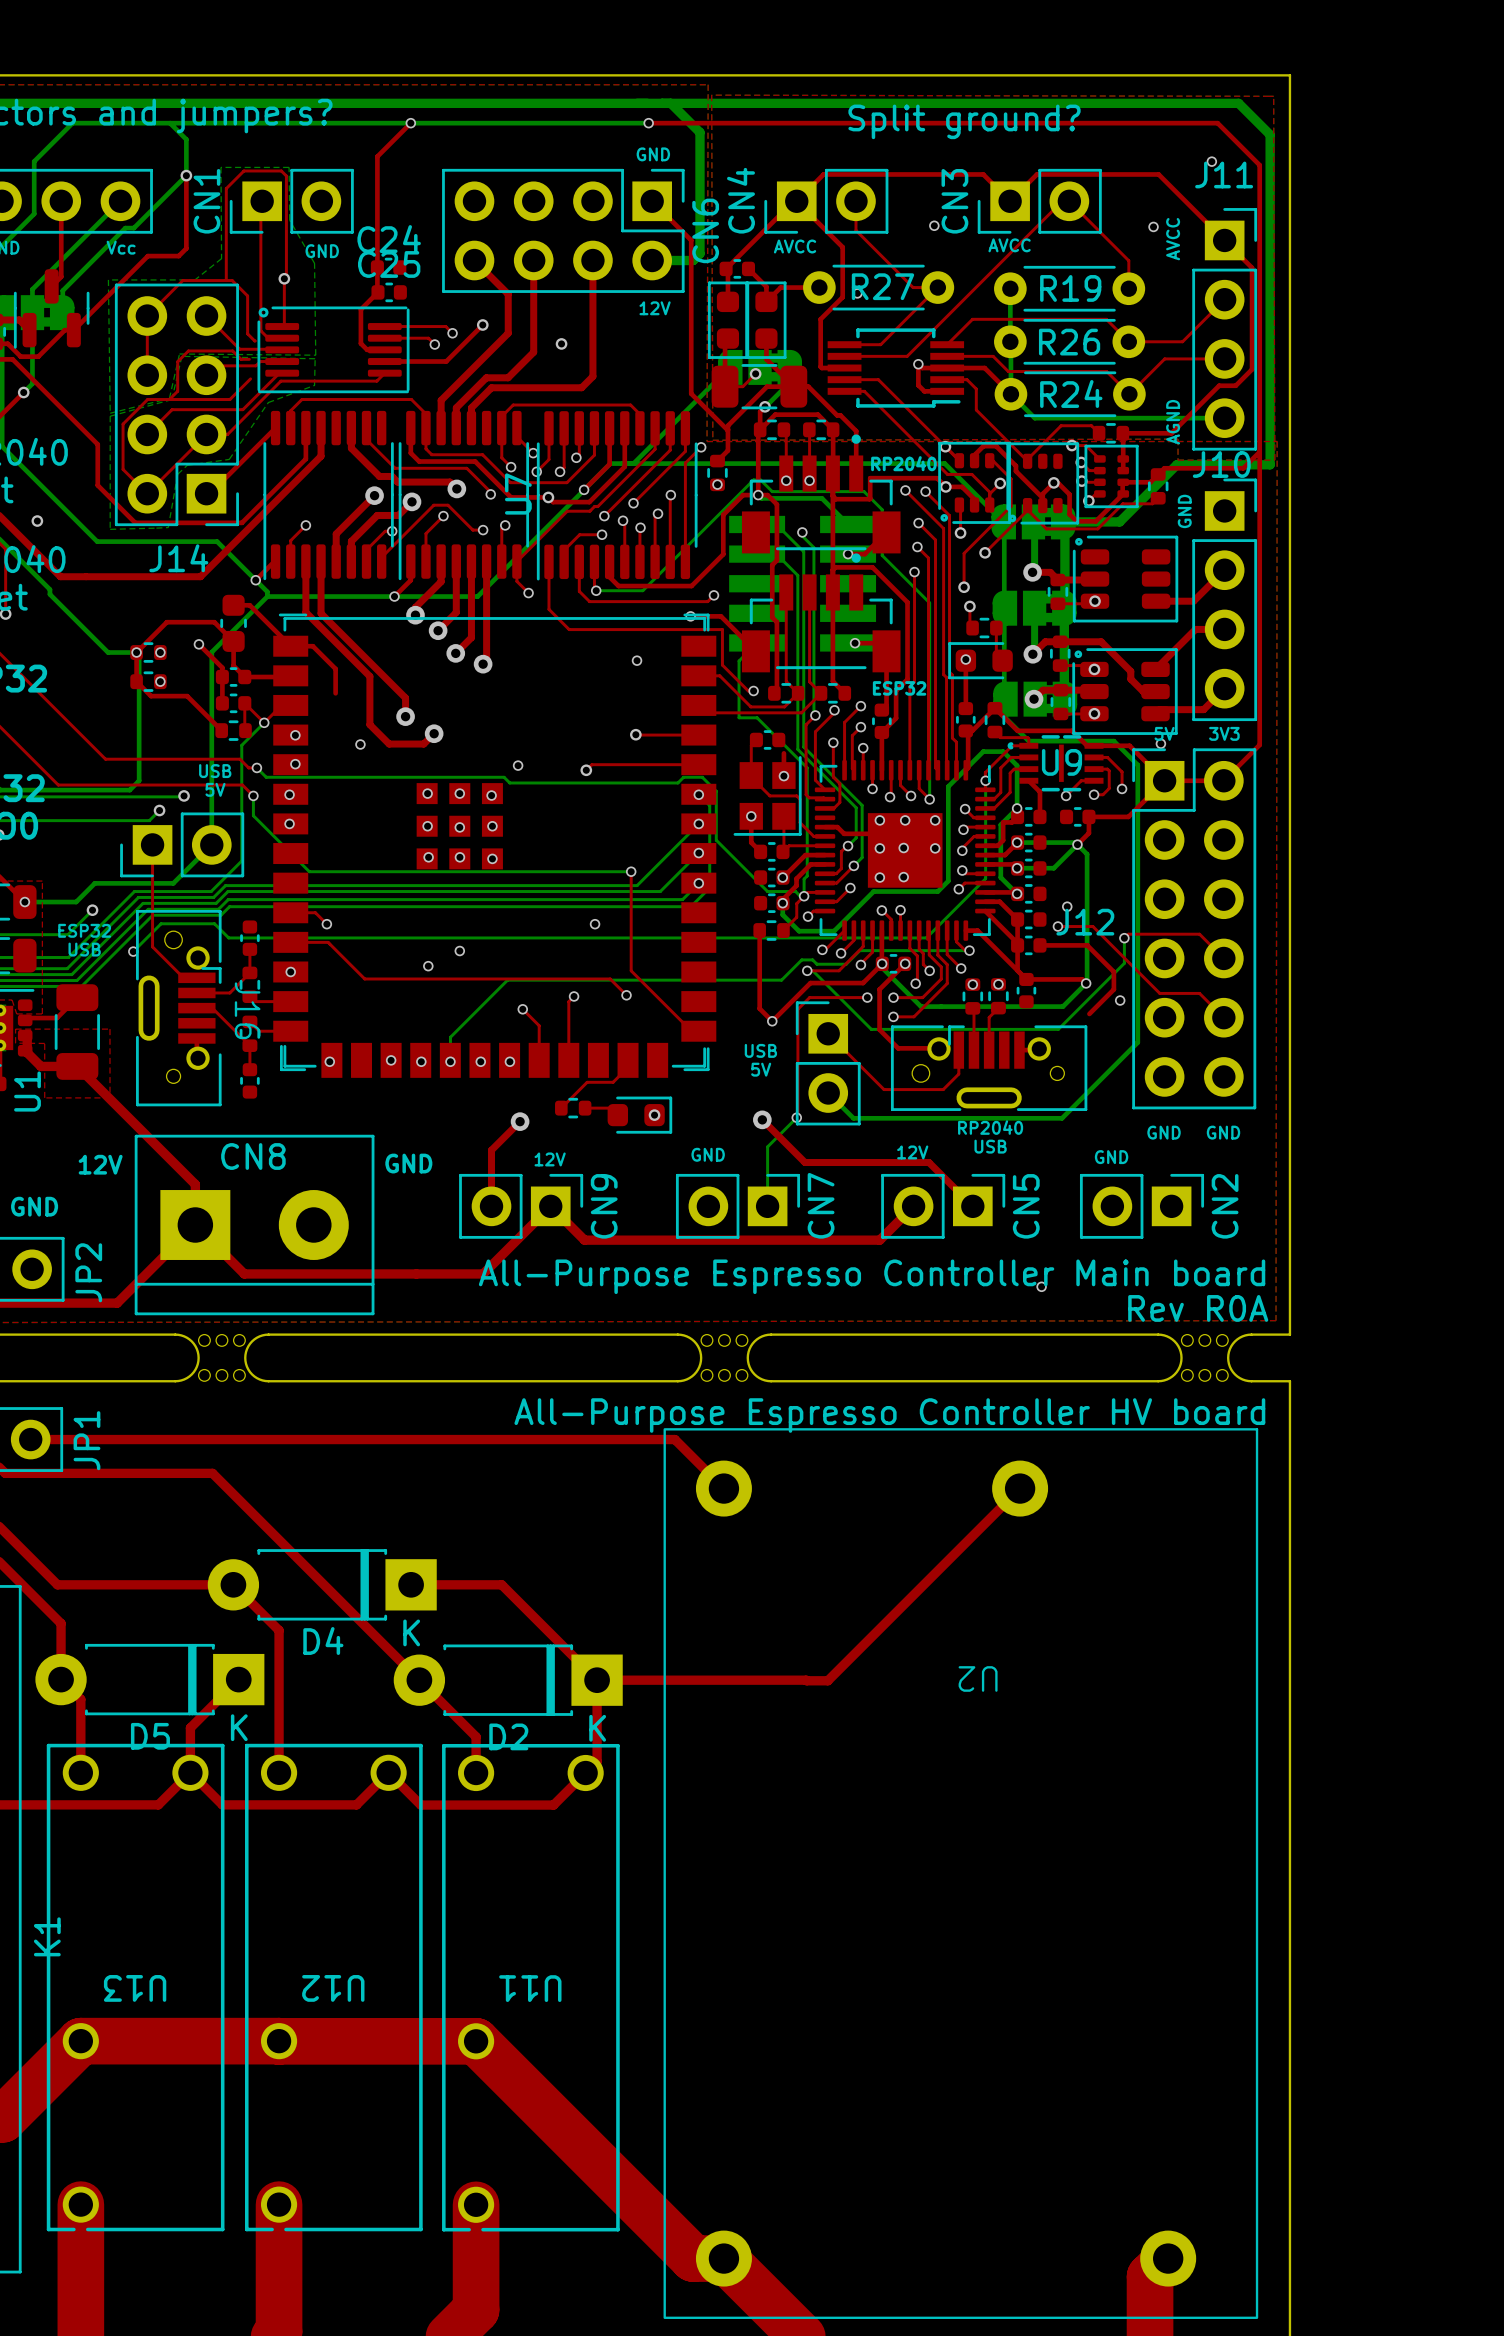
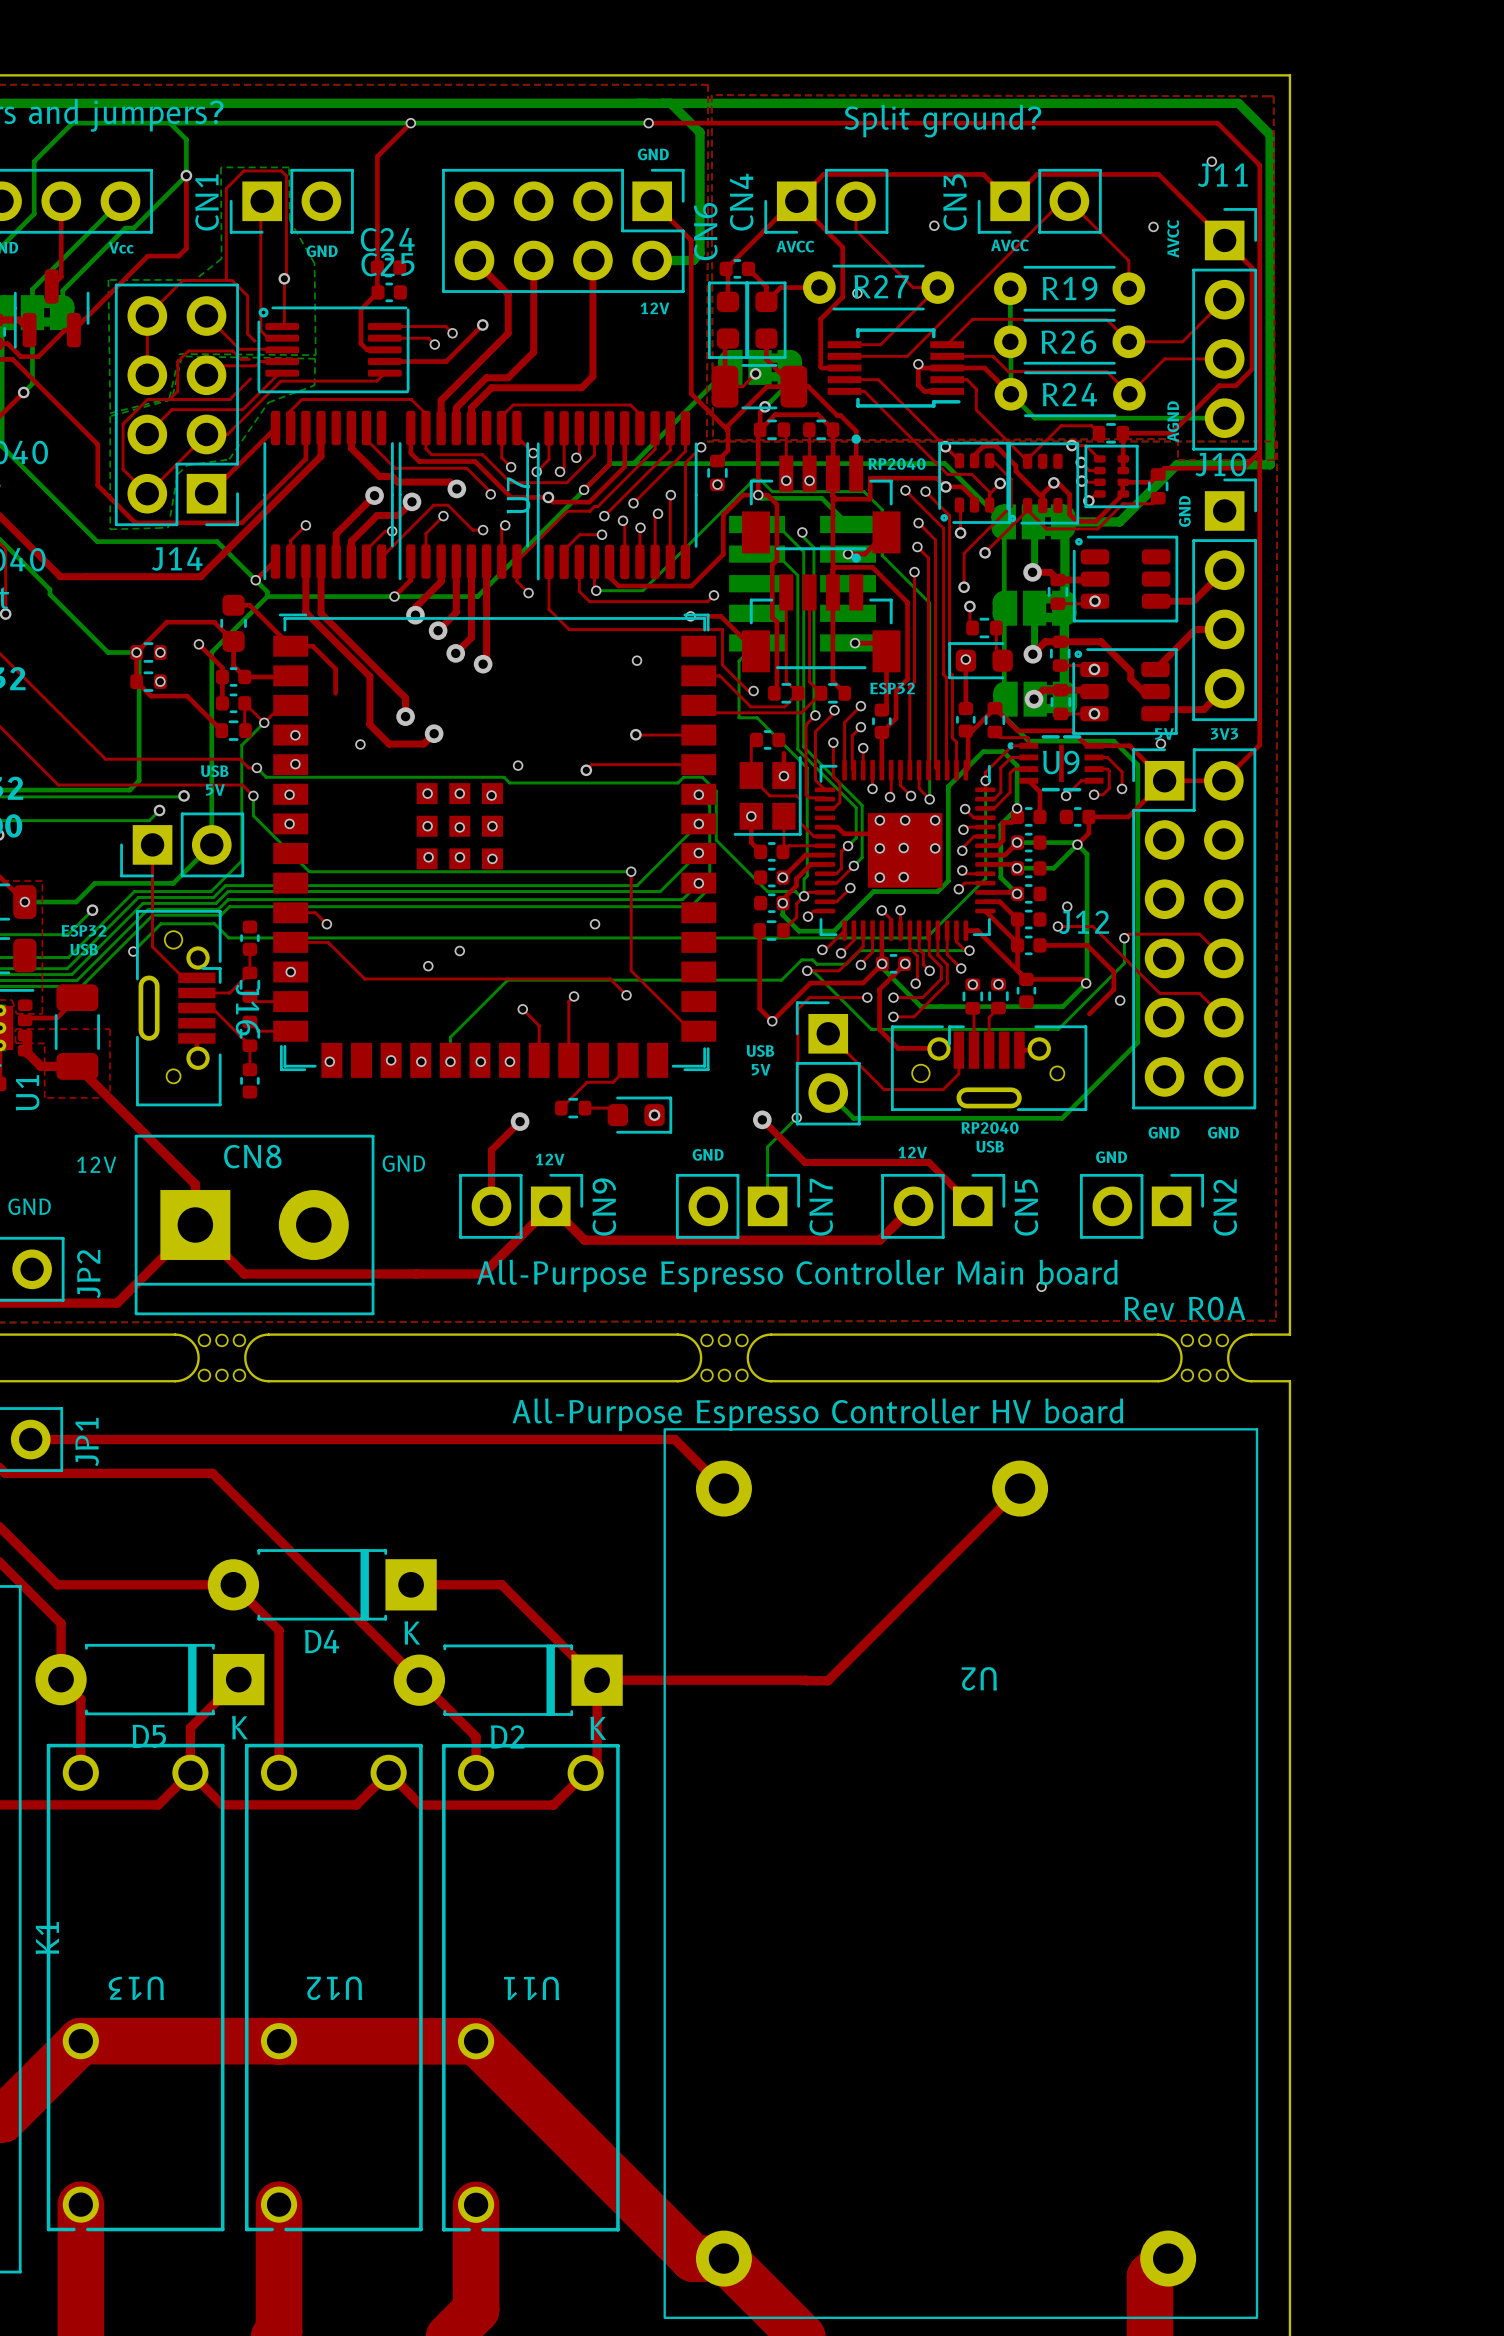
via: (561, 343) -> none
via: (37, 521) -> none

